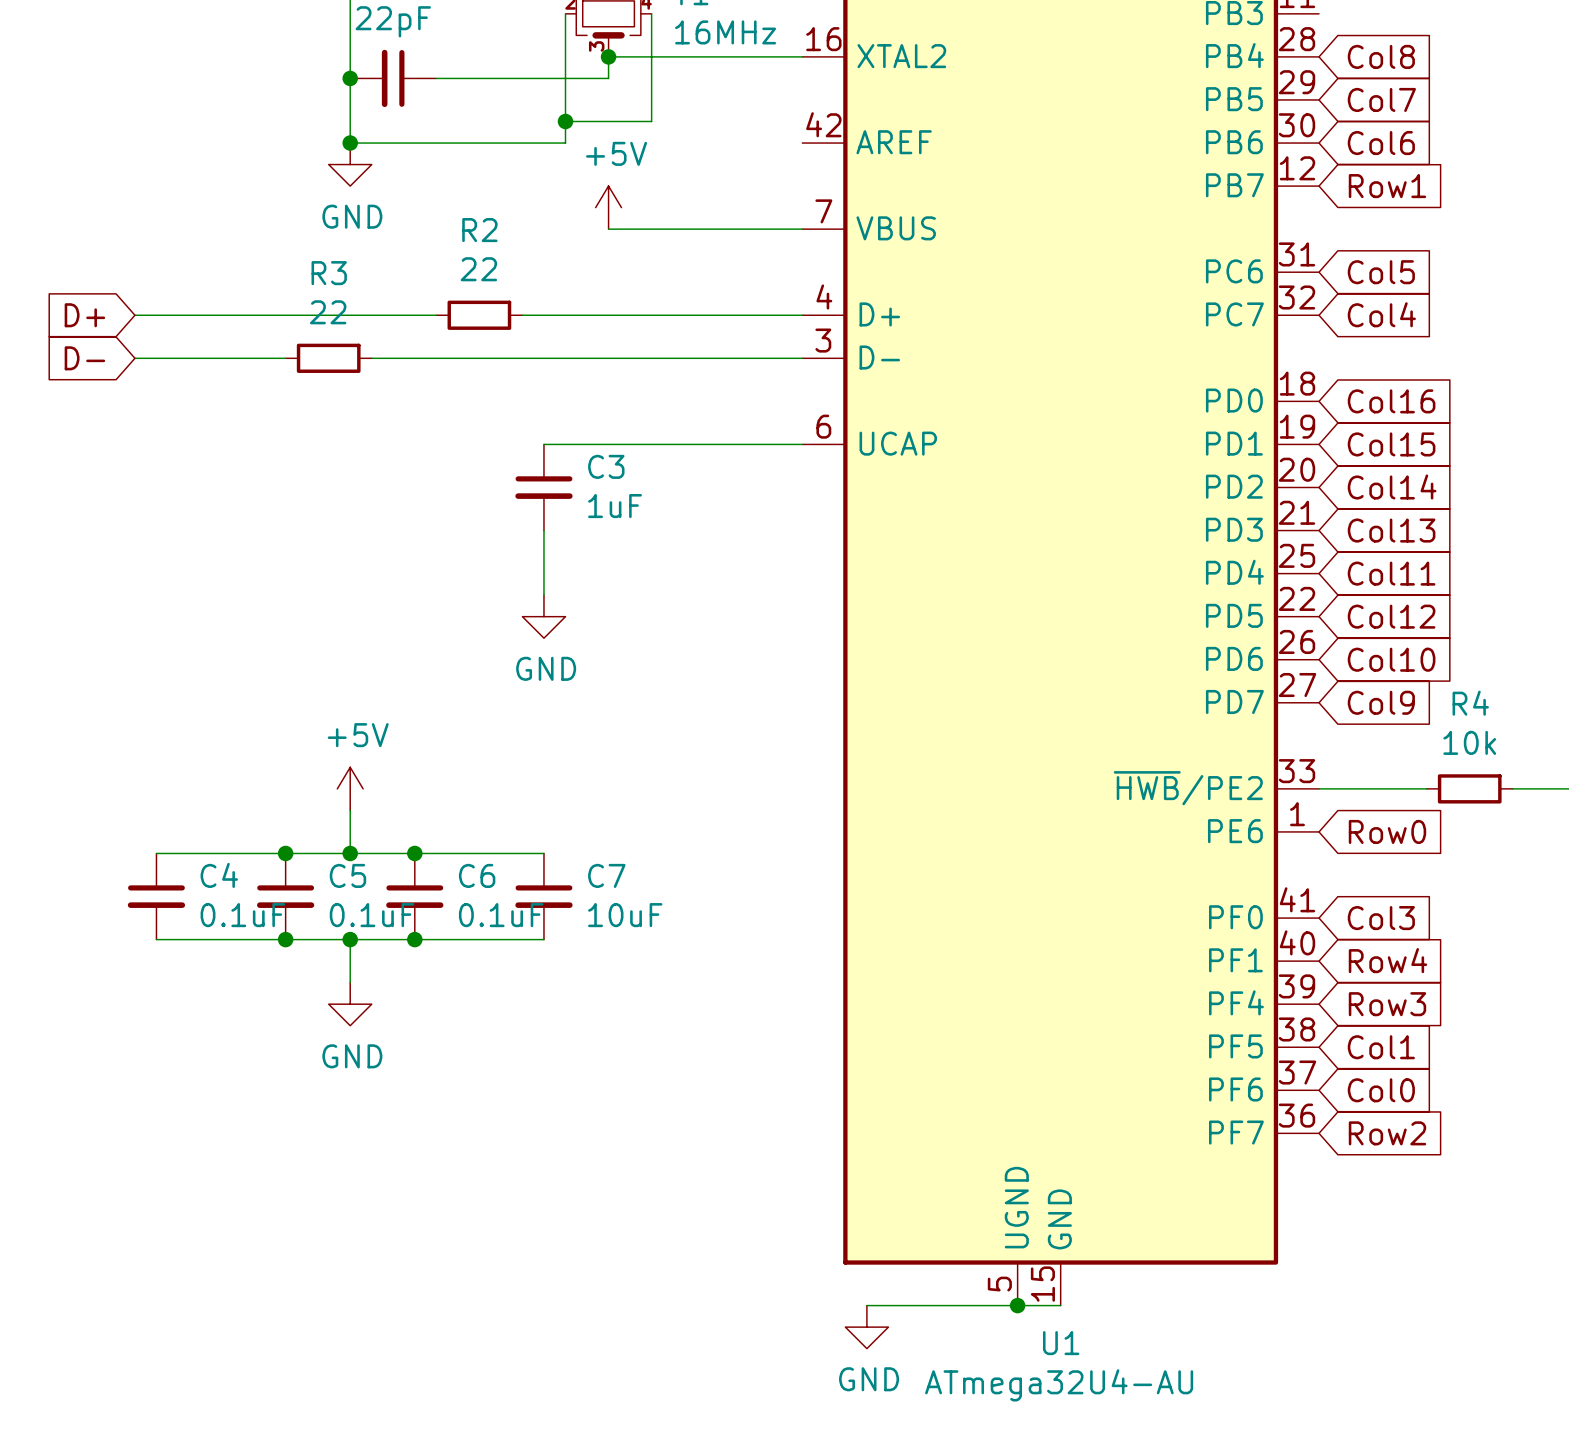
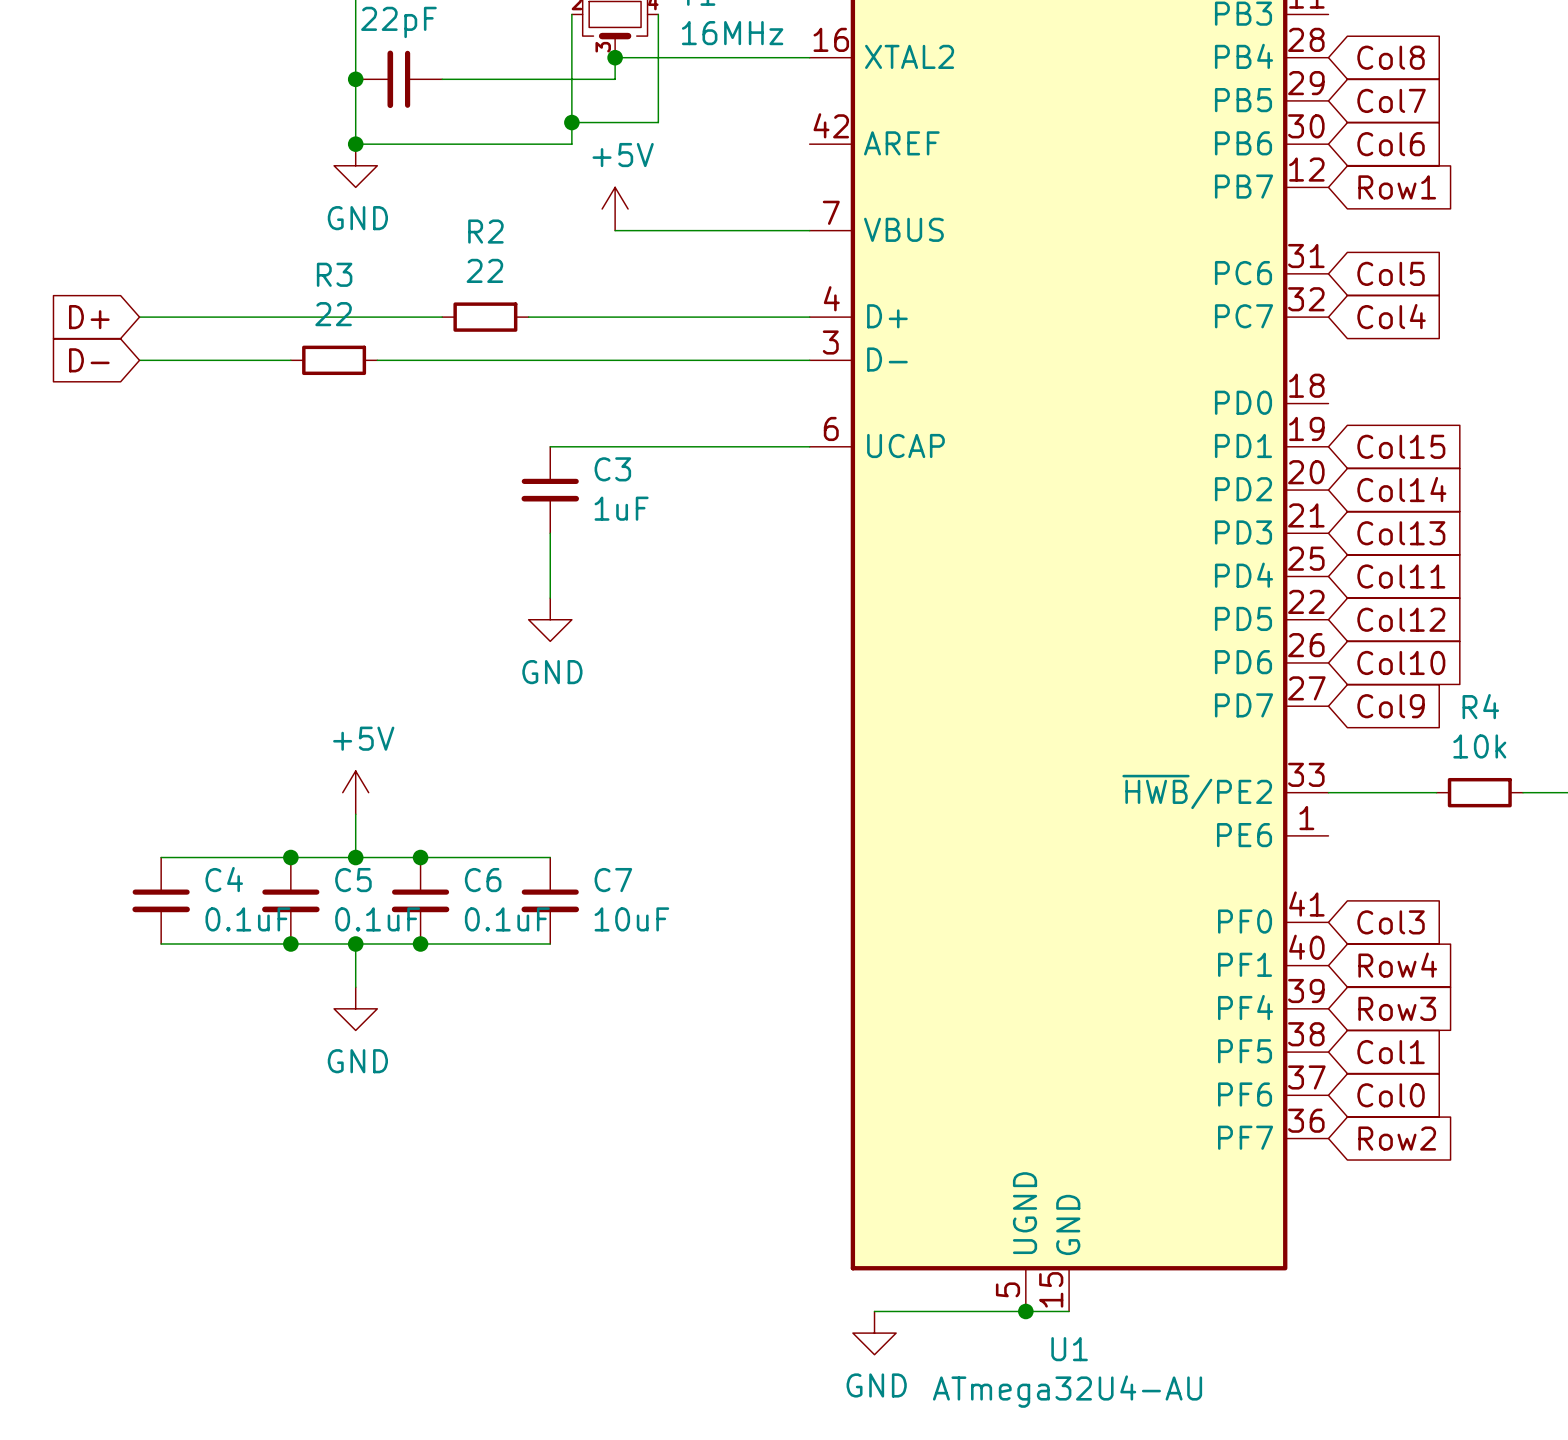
global label: Col16 (1391, 401) -> none
global label: Row0 (1387, 831) -> none

